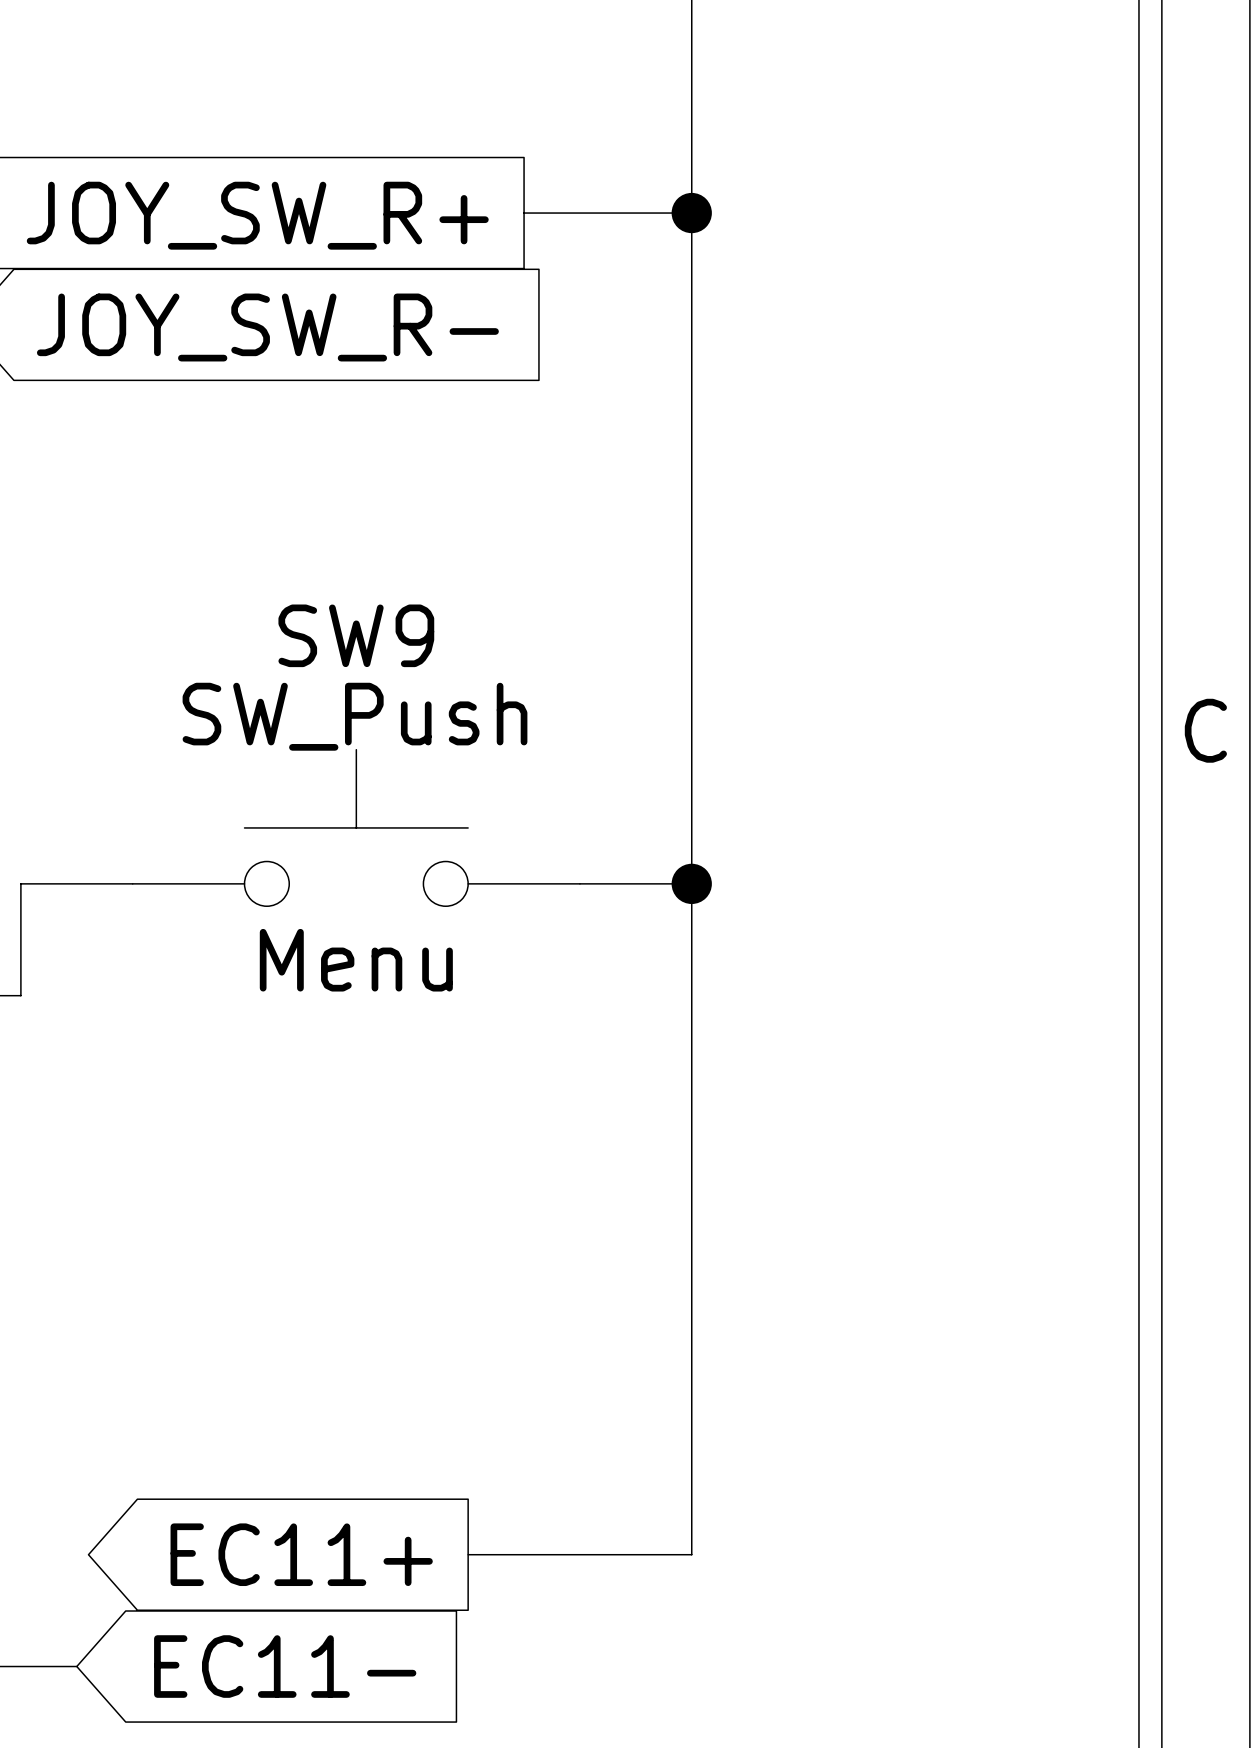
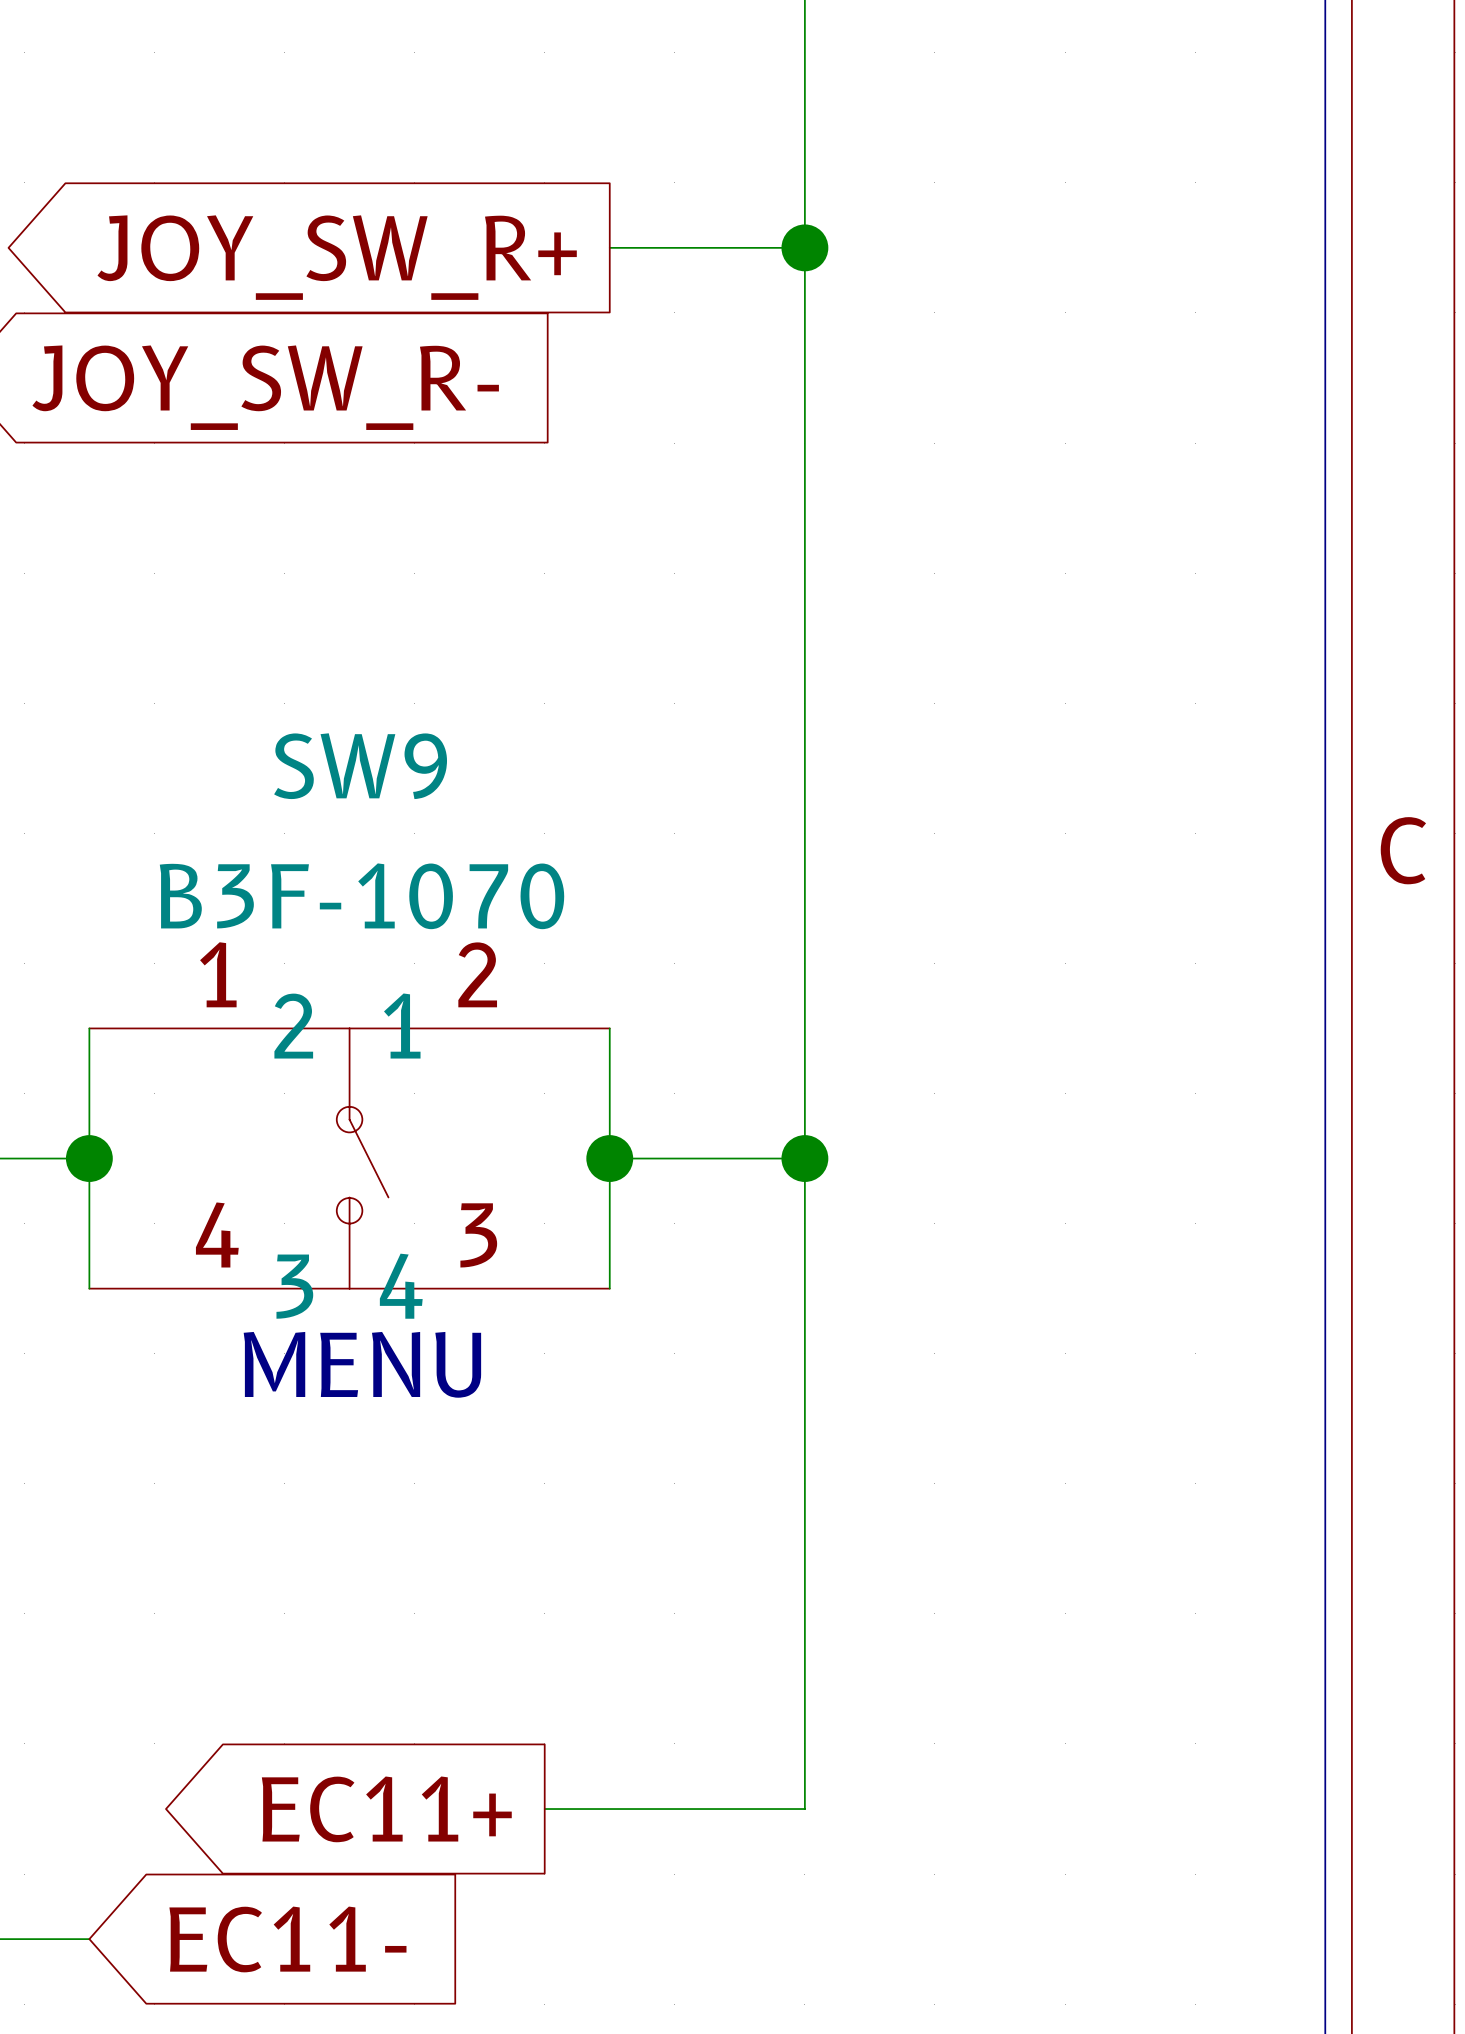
SW9 name position: SW9 (356, 635) -> SW9 (360, 766)
SW9 value: SW_Push (355, 716) -> B3F-1070 (361, 896)
SW9 symbol: [132, 749, 580, 907] -> [89, 1028, 610, 1289]
wire: none -> (89, 1028) (89, 1288)
wire: (132, 883) (20, 883) (20, 995) -> (89, 1158) (24, 1158)
wire: none -> (609, 1028) (609, 1288)
wire: (579, 883) (691, 883) -> none
junction: (691, 883) -> none
text: Menu (356, 960) -> none
junction: none -> (89, 1158)
wire: none -> (609, 1158) (804, 1158)
junction: none -> (609, 1158)
junction: none -> (804, 1158)
text: none -> MENU (362, 1364)

